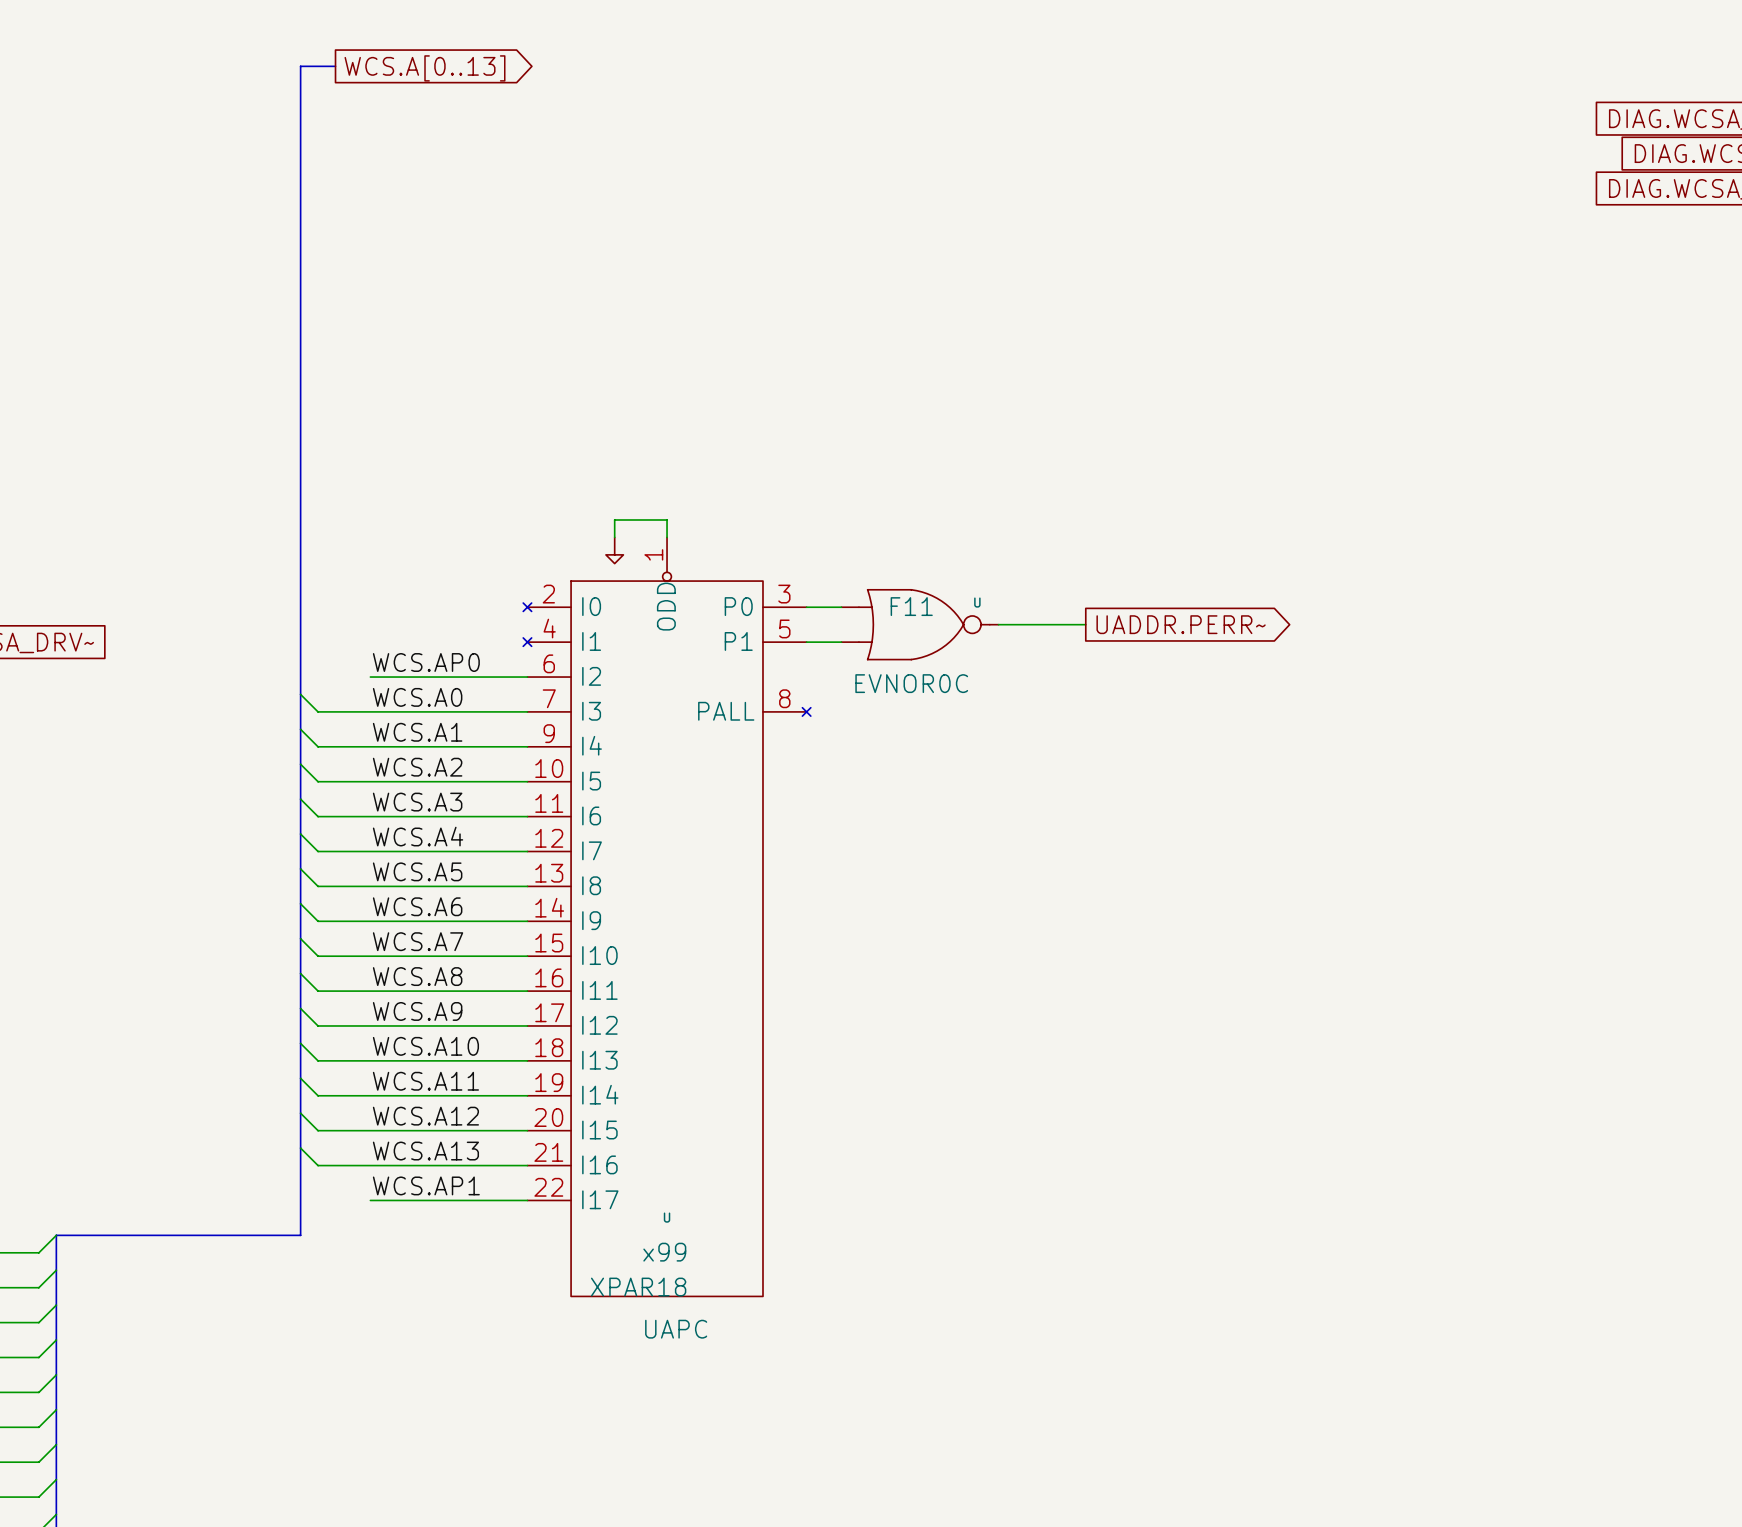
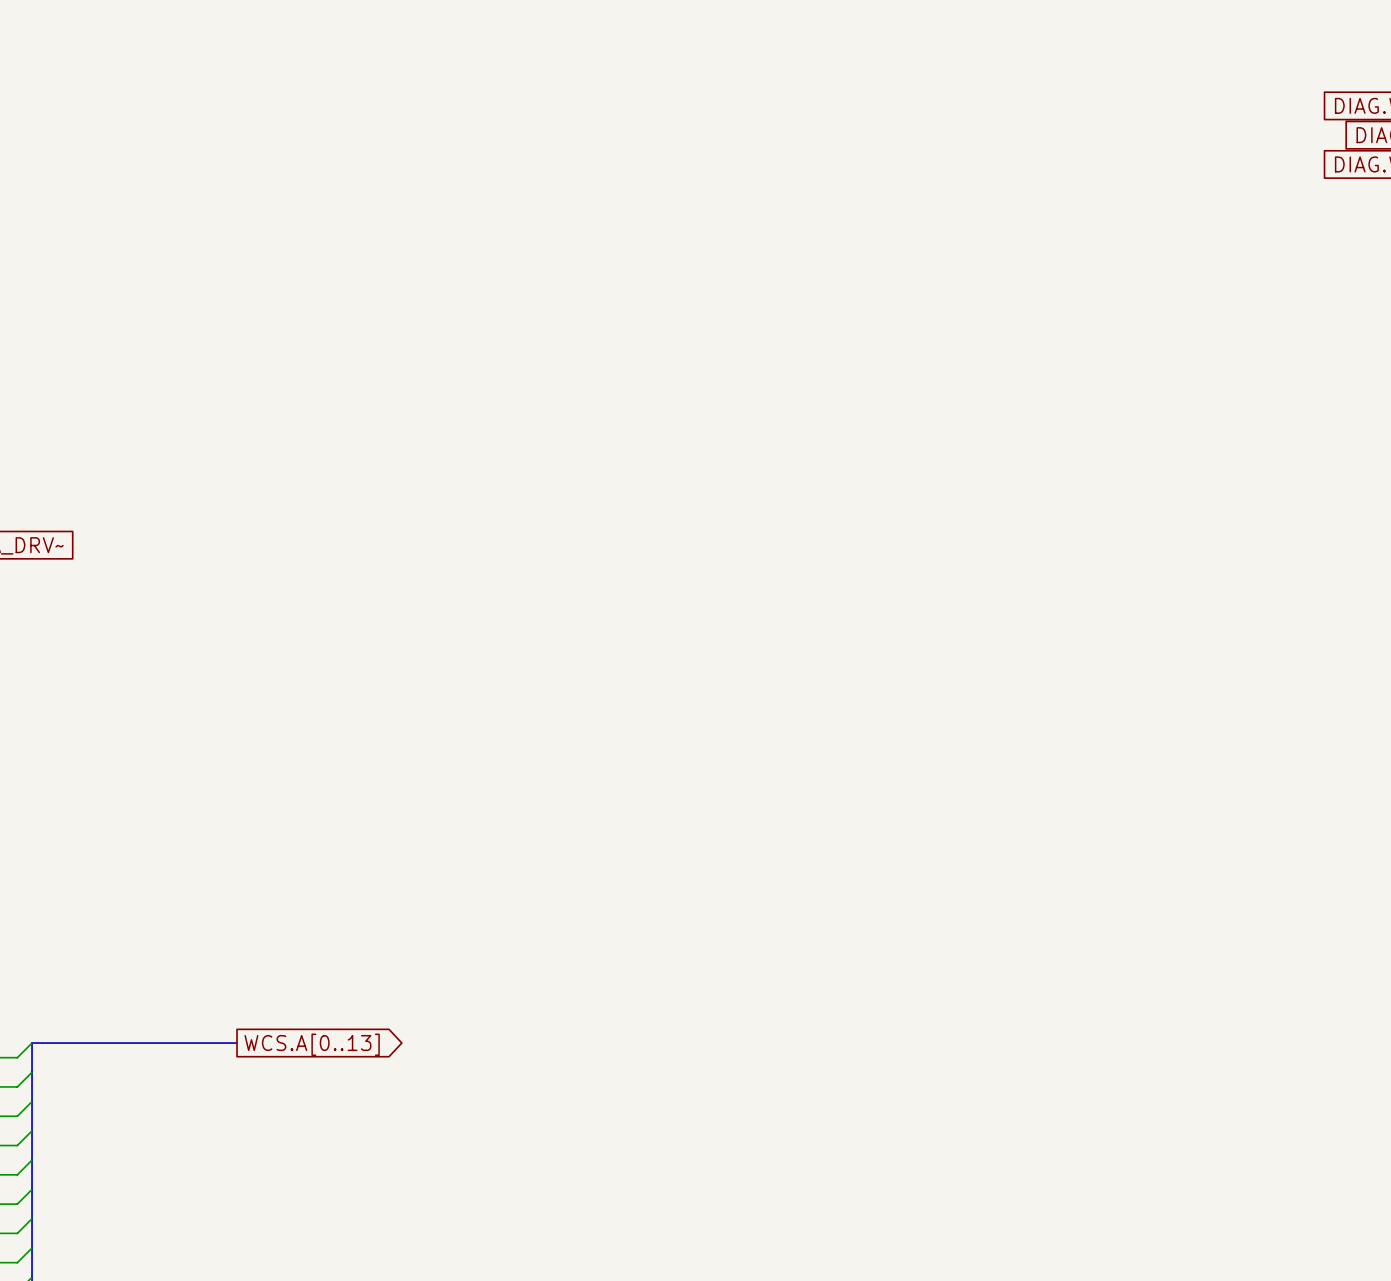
bus: (335, 66) (300, 66) (300, 1235) -> none
global label: WCS.A[0..13] (425, 68) -> none
wire: (614, 537) (614, 519) (667, 519) (667, 537) -> none
power symbol: (614, 550) -> none
no-connect mark: (527, 607) -> none
wire: (806, 607) (841, 607) -> none
U: (920, 624) -> none
wire: (998, 624) (1085, 624) -> none
global label: UADDR.PERR~ (1181, 624) -> none
no-connect mark: (527, 642) -> none
wire: (806, 642) (841, 642) -> none
label: WCS.AP0 (426, 662) -> none
wire: (370, 677) (527, 677) -> none
wire: (300, 694) (318, 711) (527, 711) -> none
label: WCS.A0 (417, 697) -> none
no-connect mark: (806, 711) -> none
wire: (300, 729) (318, 746) (527, 746) -> none
label: WCS.A1 (417, 732) -> none
wire: (300, 764) (318, 781) (527, 781) -> none
label: WCS.A2 (417, 767) -> none
wire: (300, 799) (318, 816) (527, 816) -> none
label: WCS.A3 (417, 802) -> none
wire: (300, 834) (318, 851) (527, 851) -> none
label: WCS.A4 (418, 836) -> none
wire: (300, 868) (318, 886) (527, 886) -> none
label: WCS.A5 (417, 871) -> none
wire: (300, 903) (318, 921) (527, 921) -> none
label: WCS.A6 (417, 906) -> none
U: XPAR18 (667, 916) -> none
wire: (300, 938) (318, 956) (527, 956) -> none
label: WCS.A7 (418, 941) -> none
wire: (300, 973) (318, 991) (527, 991) -> none
label: WCS.A8 (417, 976) -> none
wire: (300, 1008) (318, 1025) (527, 1025) -> none
label: WCS.A9 (417, 1011) -> none
wire: (300, 1043) (318, 1060) (527, 1060) -> none
label: WCS.A10 (425, 1046) -> none
wire: (300, 1078) (318, 1095) (527, 1095) -> none
label: WCS.A11 (425, 1081) -> none
wire: (300, 1113) (318, 1130) (527, 1130) -> none
label: WCS.A12 (425, 1116) -> none
wire: (300, 1148) (318, 1165) (527, 1165) -> none
label: WCS.A13 (425, 1151) -> none
label: WCS.AP1 (426, 1185) -> none
wire: (370, 1200) (527, 1200) -> none
global label: none -> WCS.A[0..13] (312, 1044)

